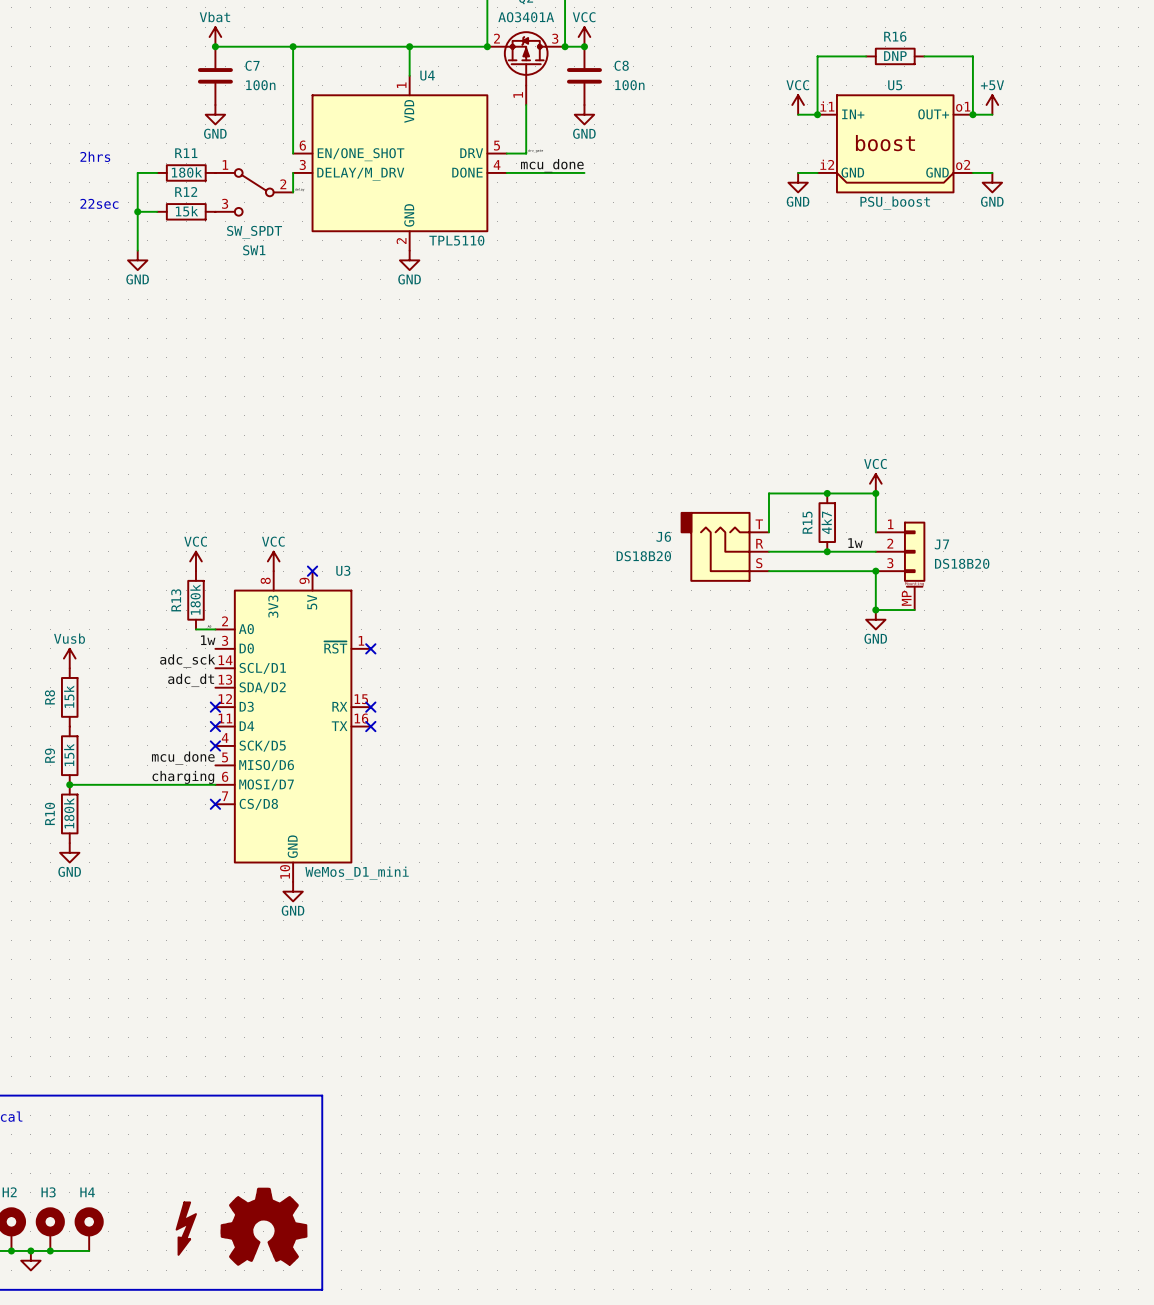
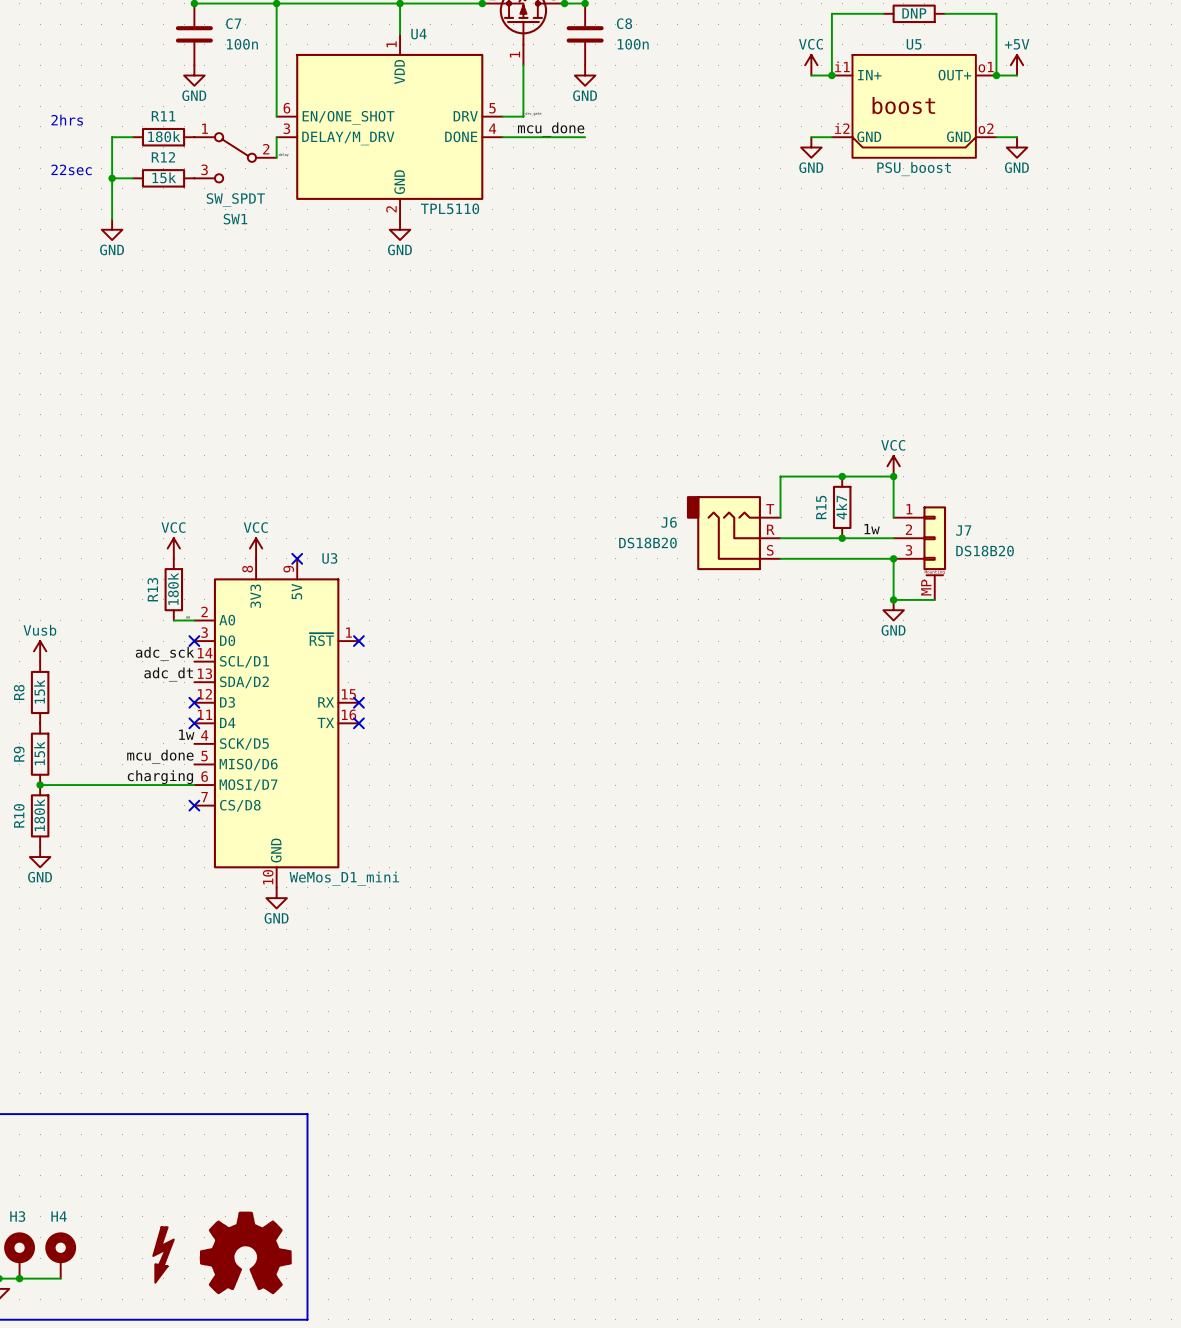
label position: 1w (208, 640) -> 1w (186, 734)
no-connect mark: none -> (194, 641)
no-connect mark: (215, 745) -> none

